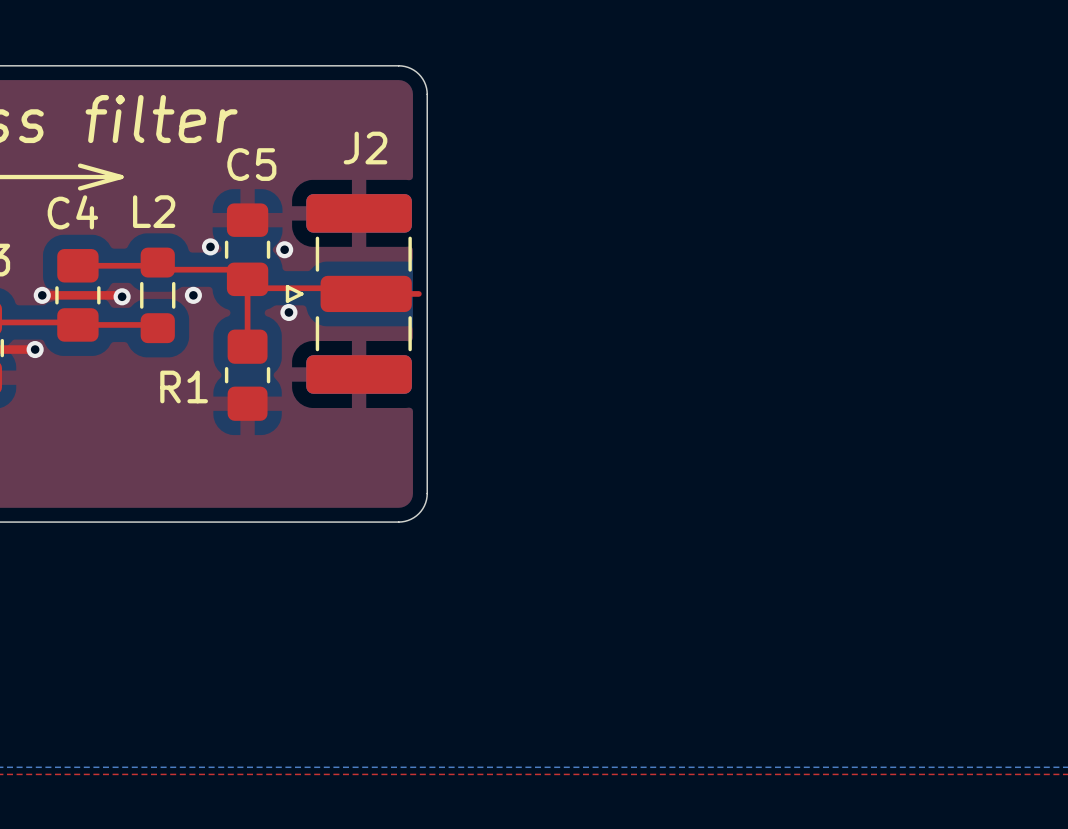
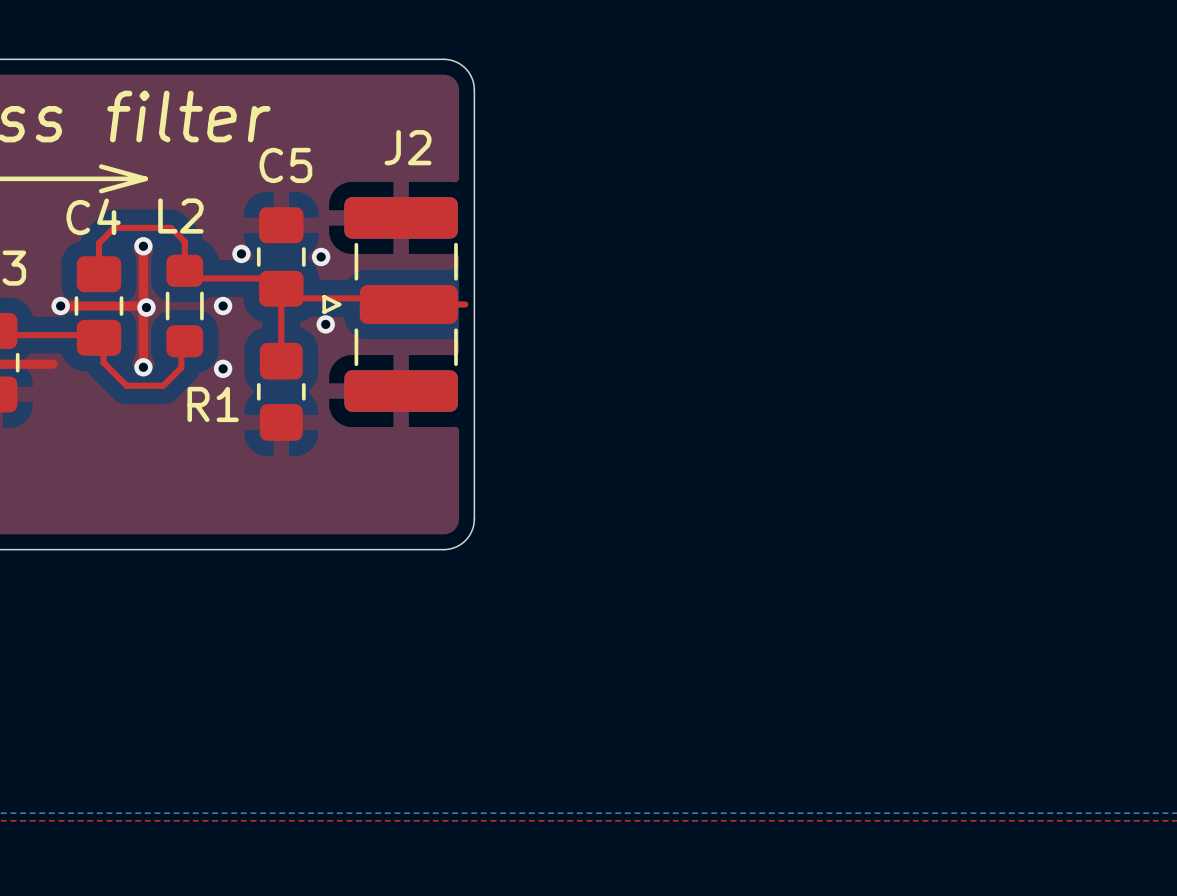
via: none -> (143, 246)
top track: none -> (144, 247) (143, 246) (143, 367)
top track: (77, 265) (154, 265) -> (98, 274) (98, 243) (114, 227) (170, 227) (184, 241) (184, 270)
top track: (77, 324) (154, 324) -> (98, 337) (103, 342) (103, 362) (126, 385) (163, 385) (181, 367) (181, 337)
via: (35, 349) -> none
via: none -> (143, 367)
via: none -> (223, 368)

